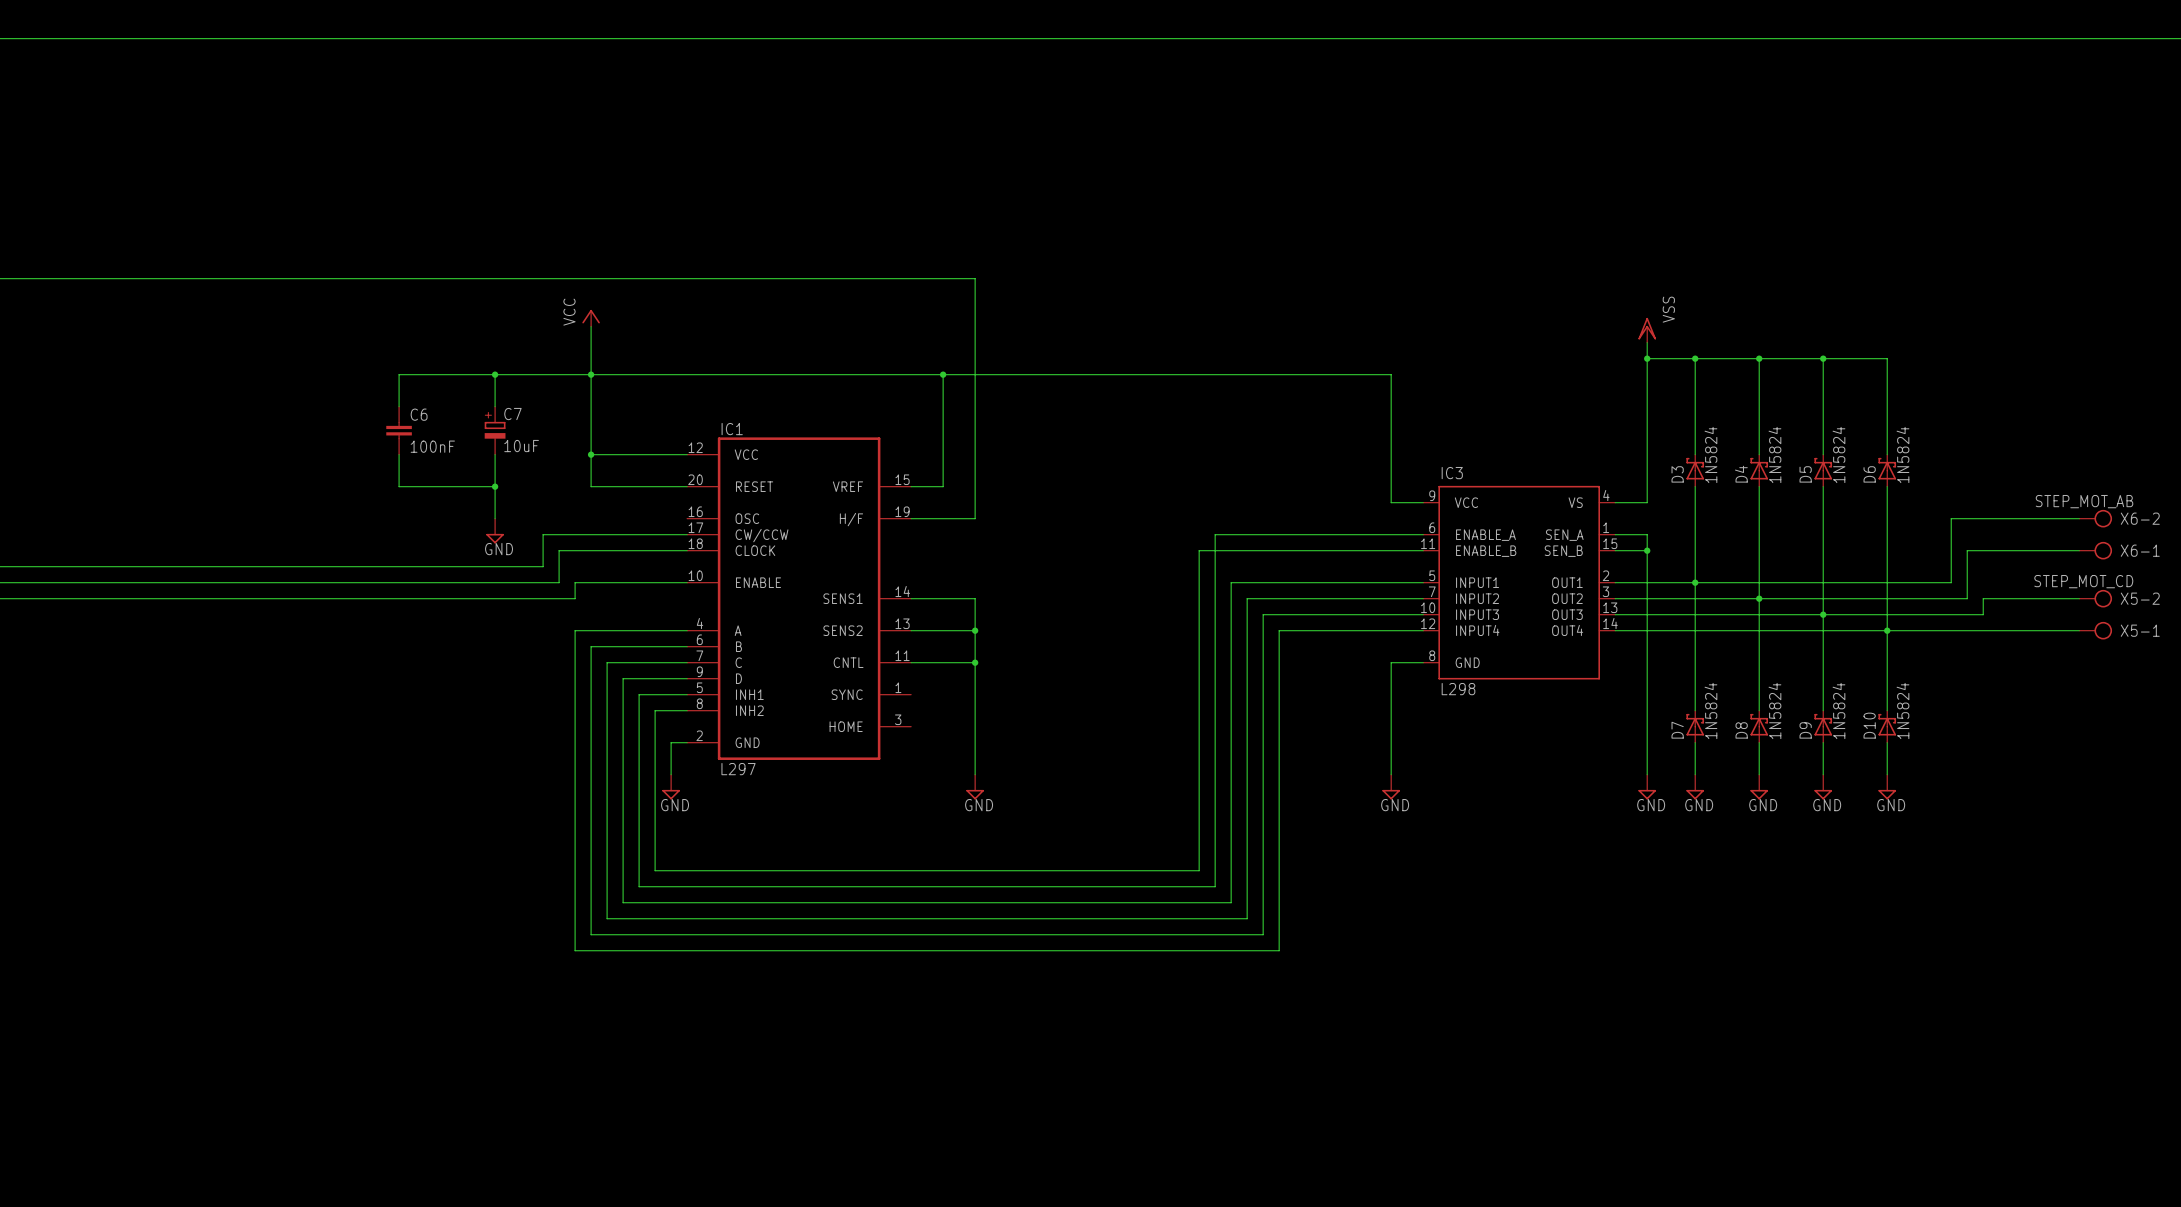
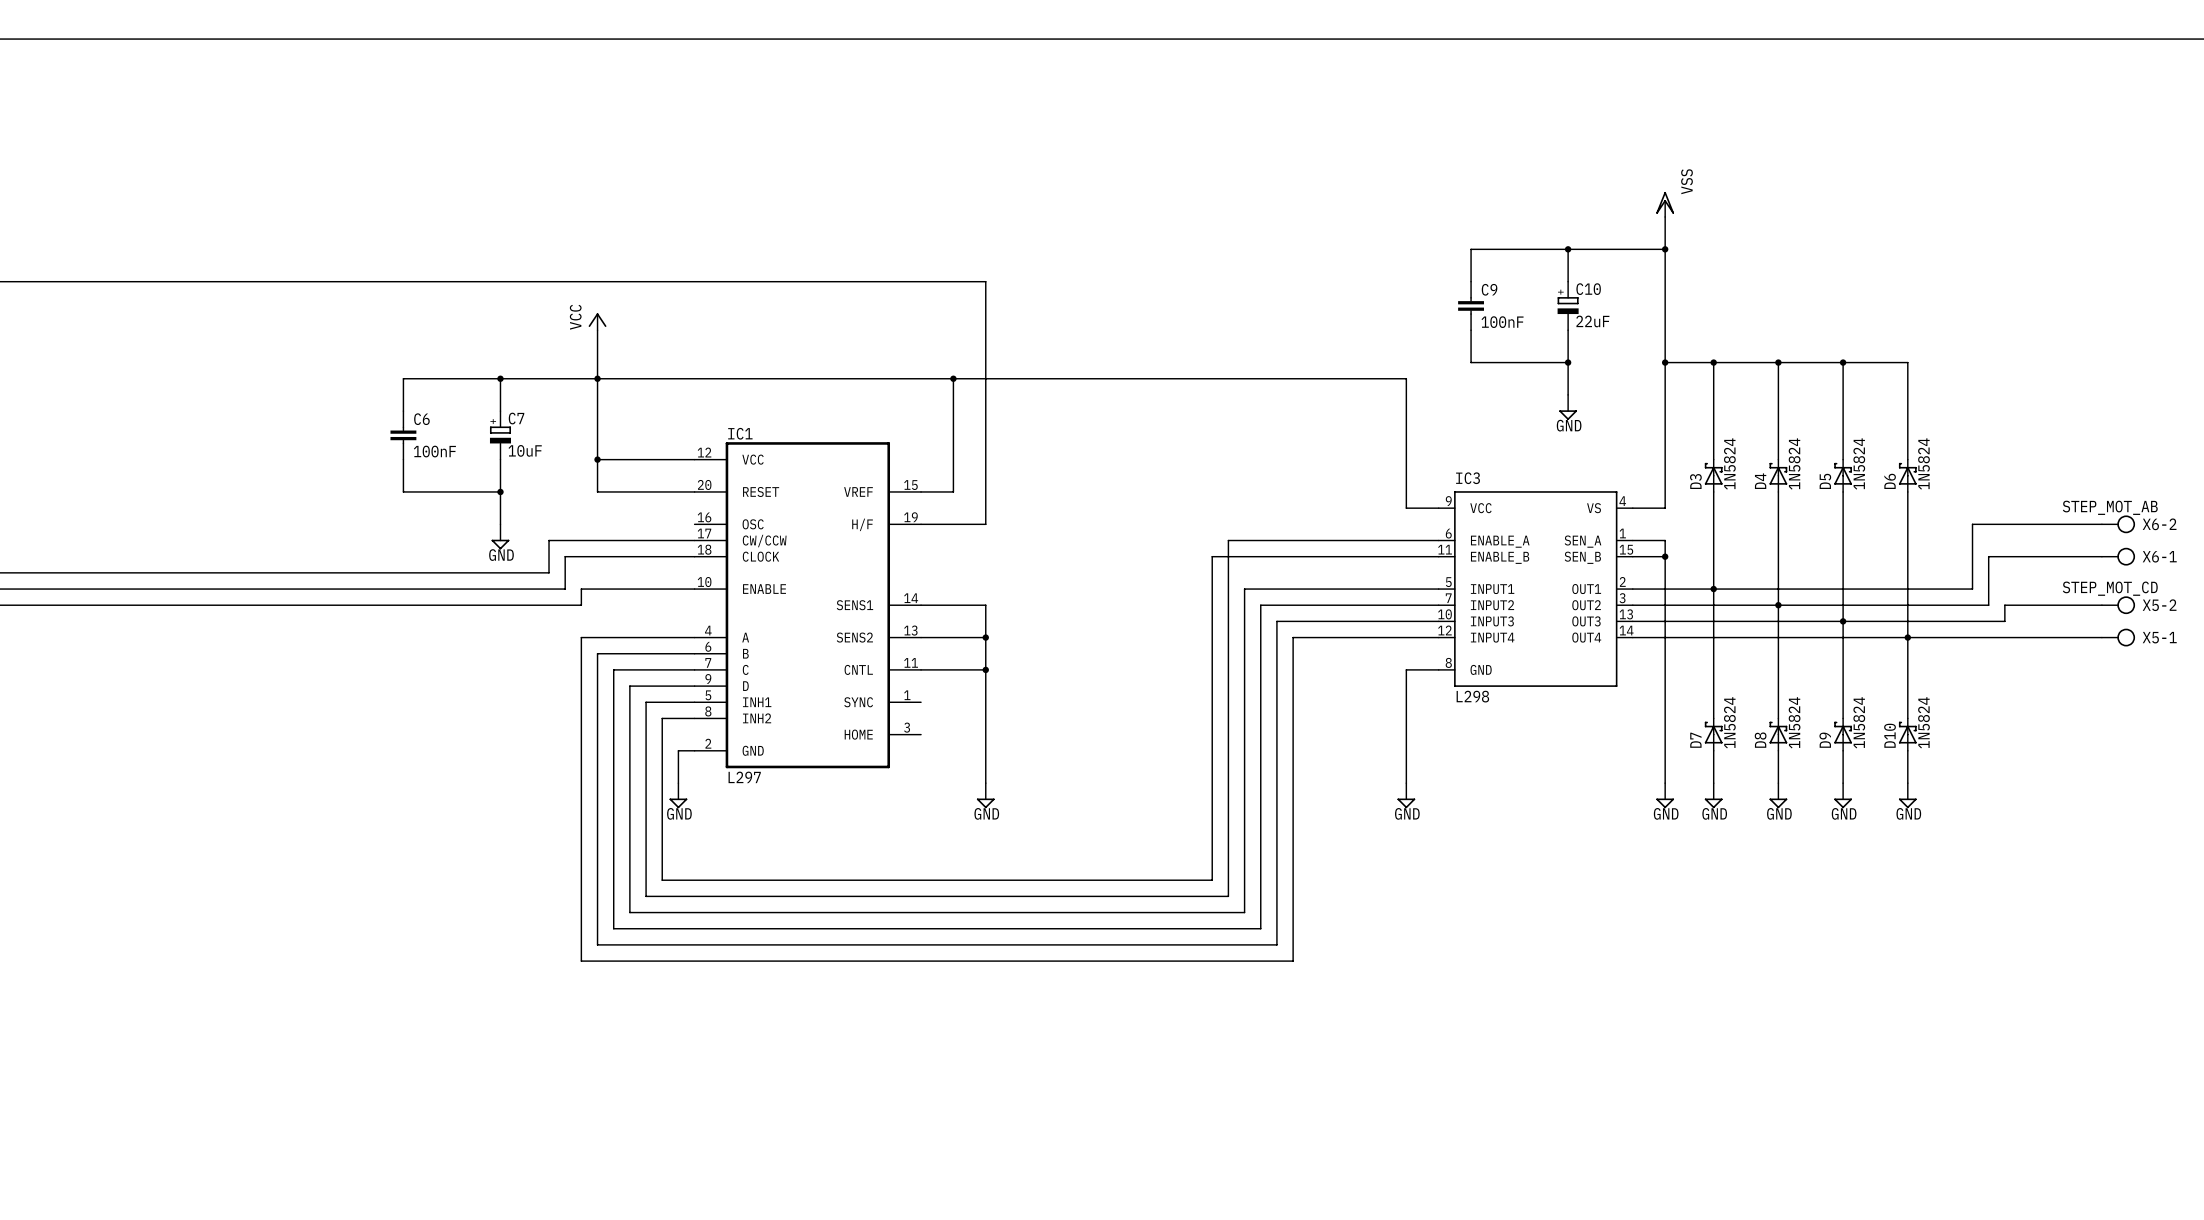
wire: none -> (1665, 216) (1665, 346)
wire: none -> (1568, 249) (1568, 281)
junction: none -> (1568, 249)
wire: none -> (1665, 249) (1471, 249) (1471, 281)
junction: none -> (1665, 249)
C9: none -> 100nF (1471, 305)
C10: none -> 22uF (1568, 305)
wire: none -> (1471, 330) (1471, 362) (1568, 362)
wire: none -> (1568, 330) (1568, 394)
power symbol position: VSS (1647, 330) -> VSS (1665, 204)
junction: none -> (1568, 362)
power symbol: none -> GND (1568, 407)

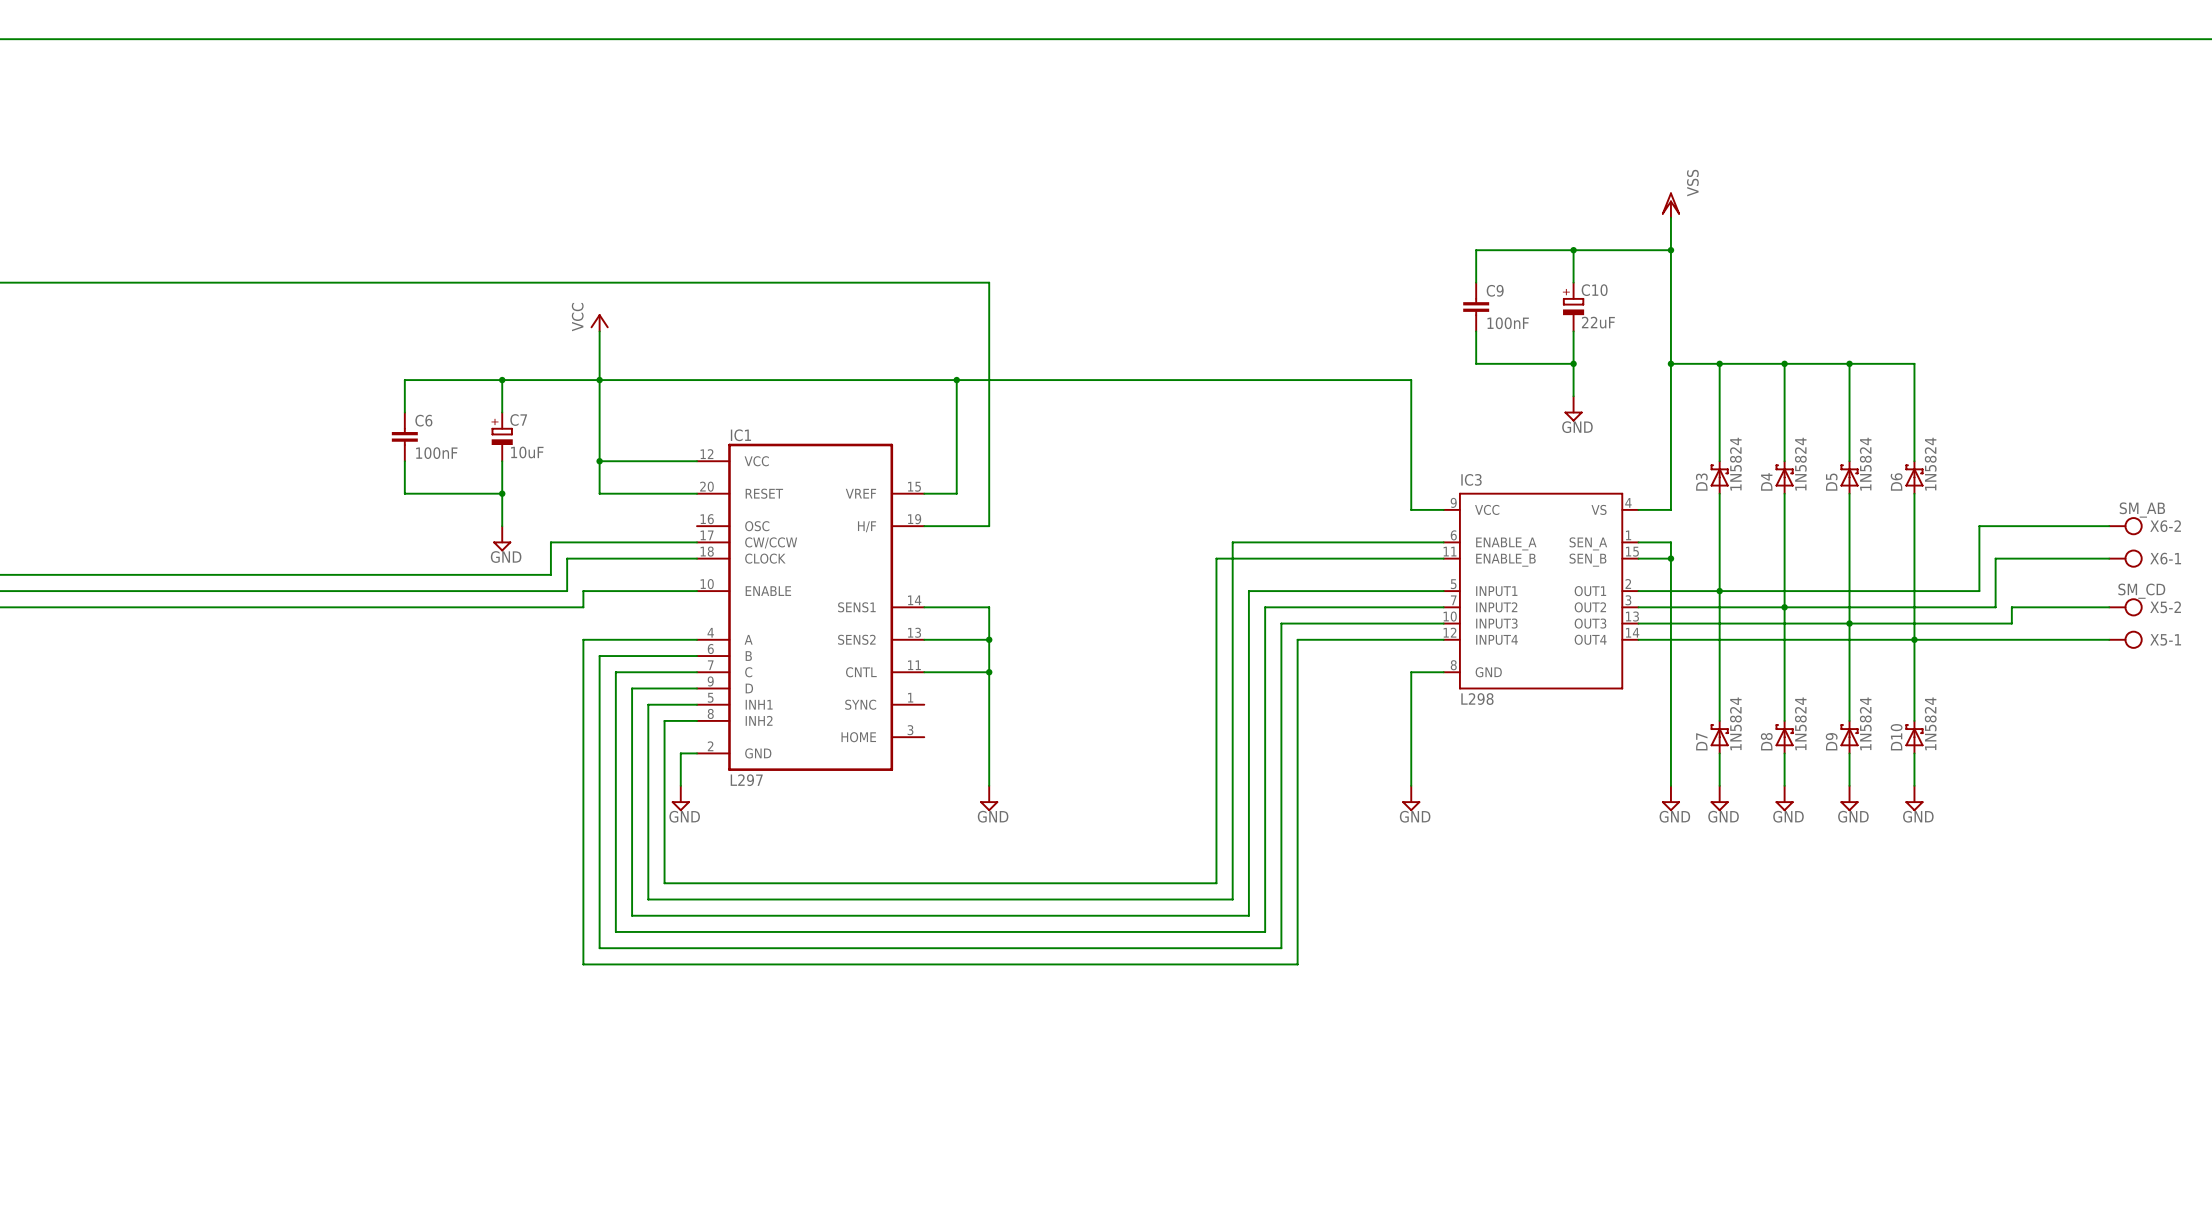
X6-2 value: STEP_MOT_AB (2110, 507) -> SM_AB (2142, 510)
X5-2 value: STEP_MOT_CD (2110, 588) -> SM_CD (2141, 591)

